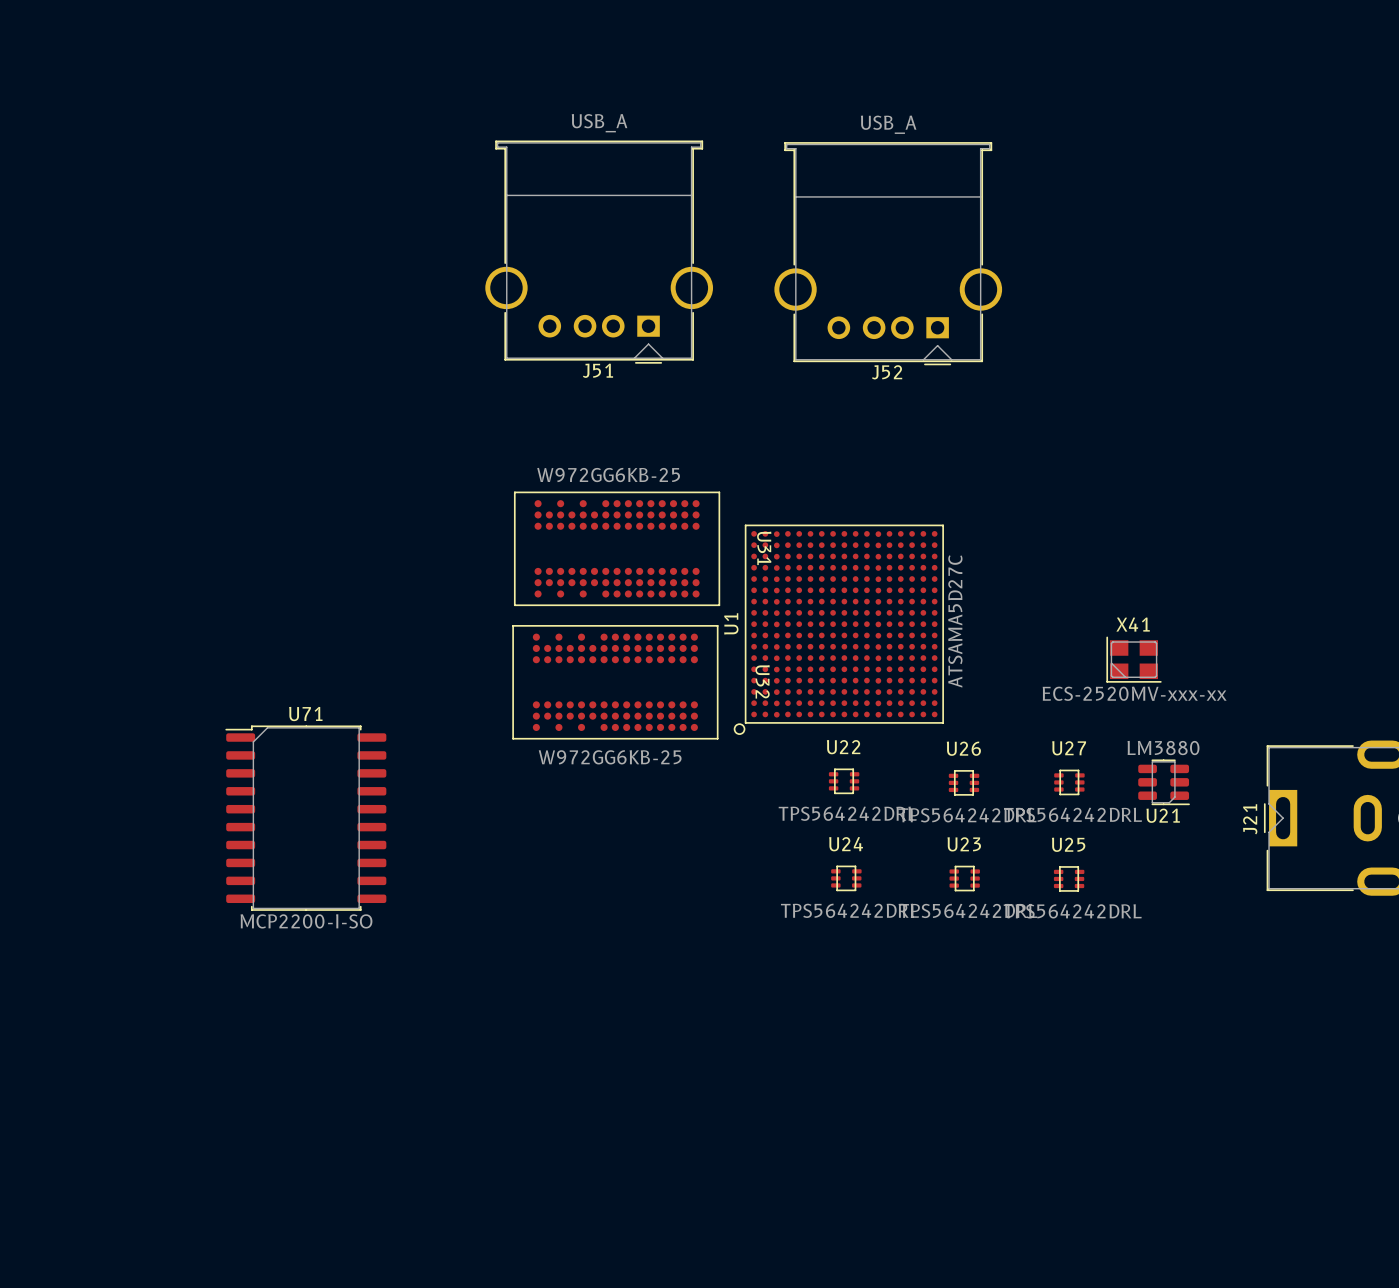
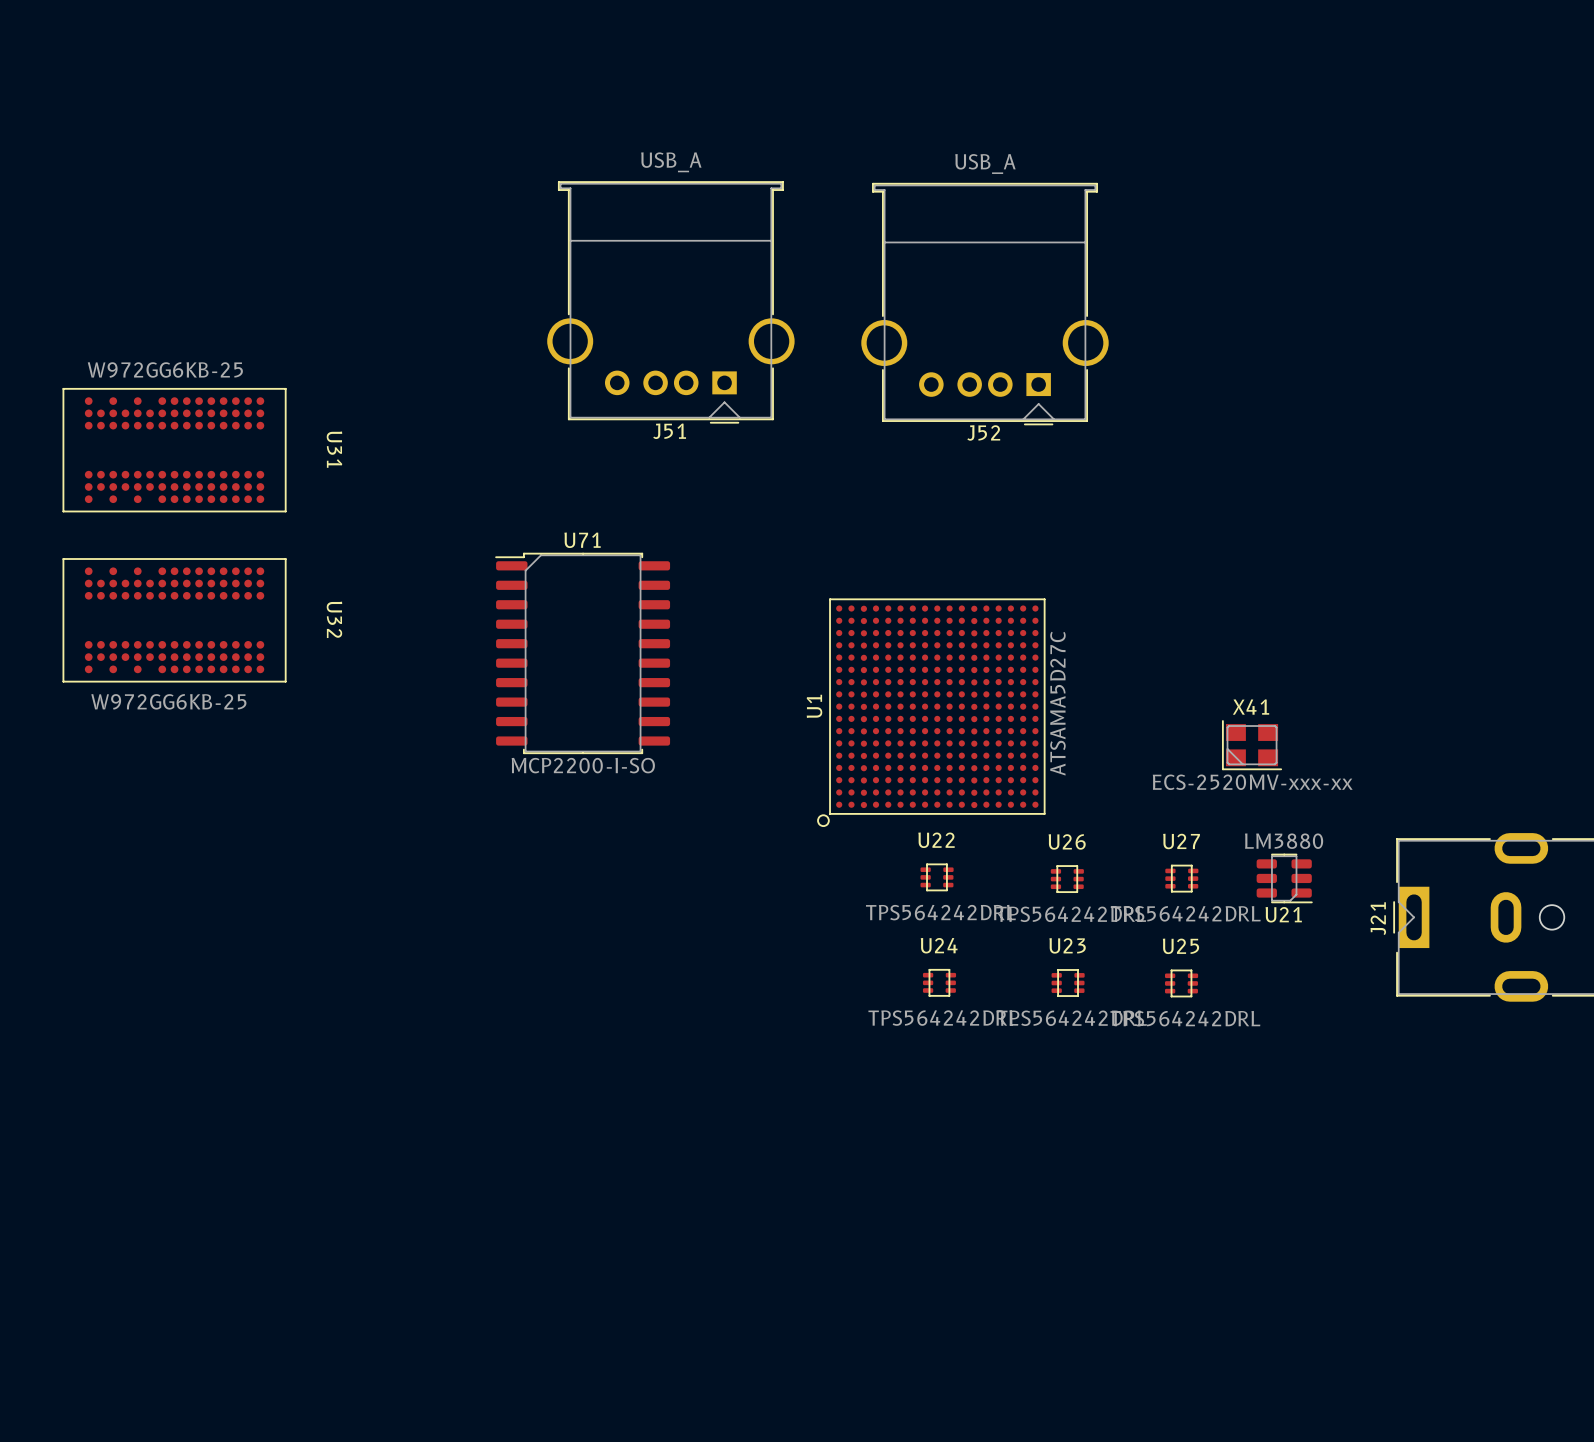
U31 position: (617, 548) -> (174, 450)
U32 position: (615, 682) -> (174, 620)
U71 position: (305, 818) -> (582, 653)

